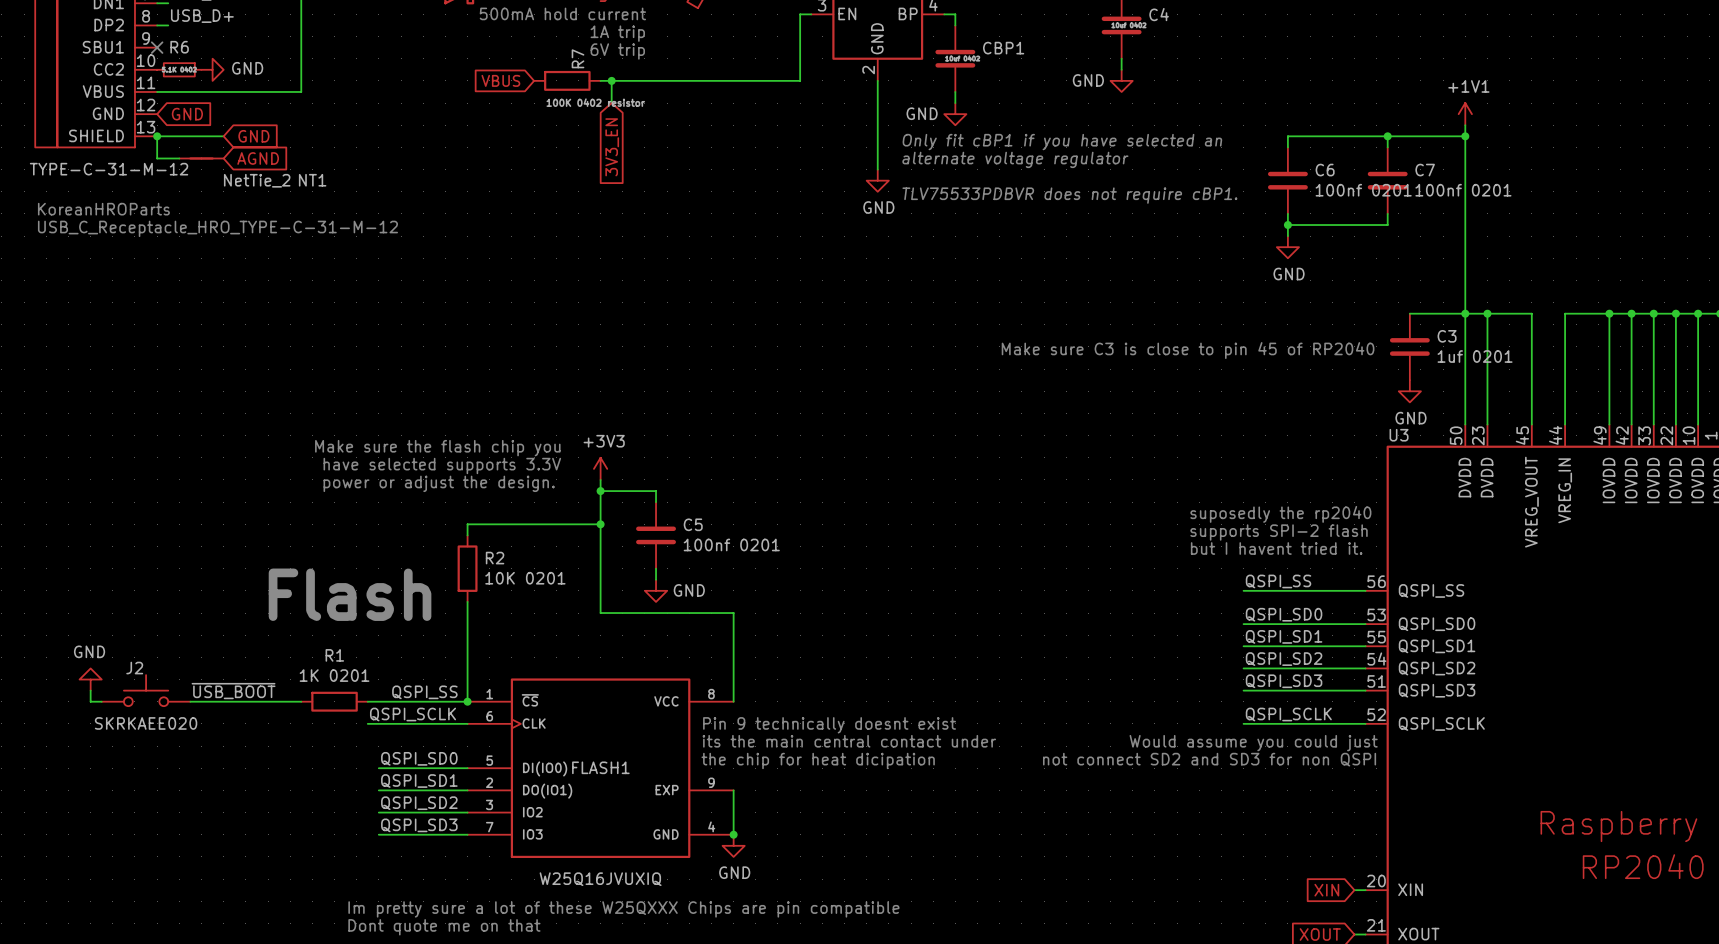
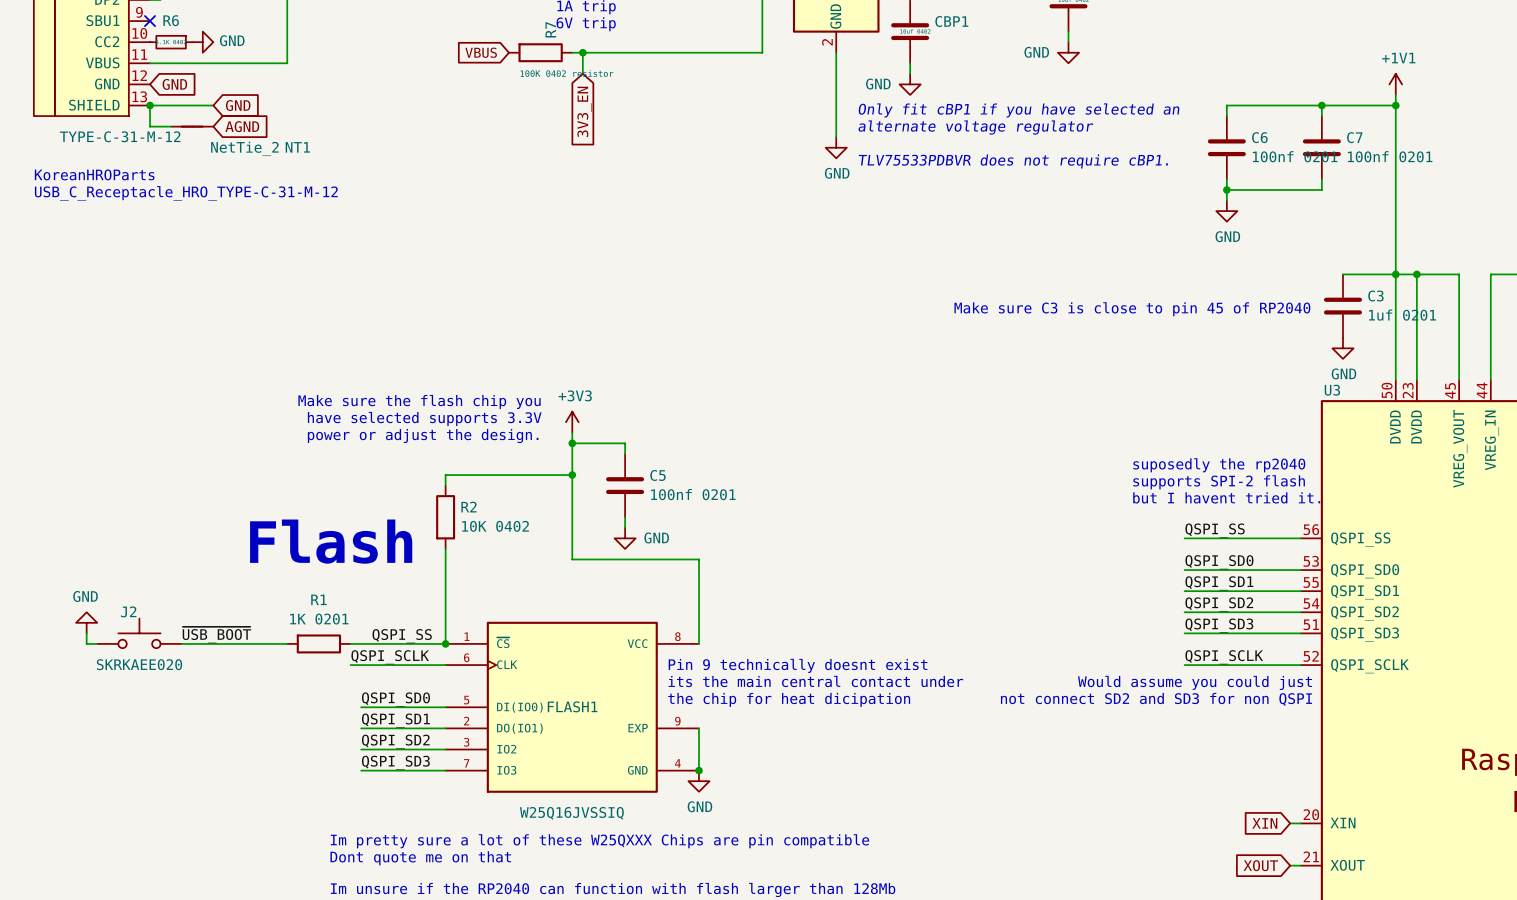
R2 value: 10K 0201 (525, 578) -> 10K 0402 (495, 526)
FLASH1 value: W25Q16JVUXIQ (600, 879) -> W25Q16JVSSIQ (571, 813)

